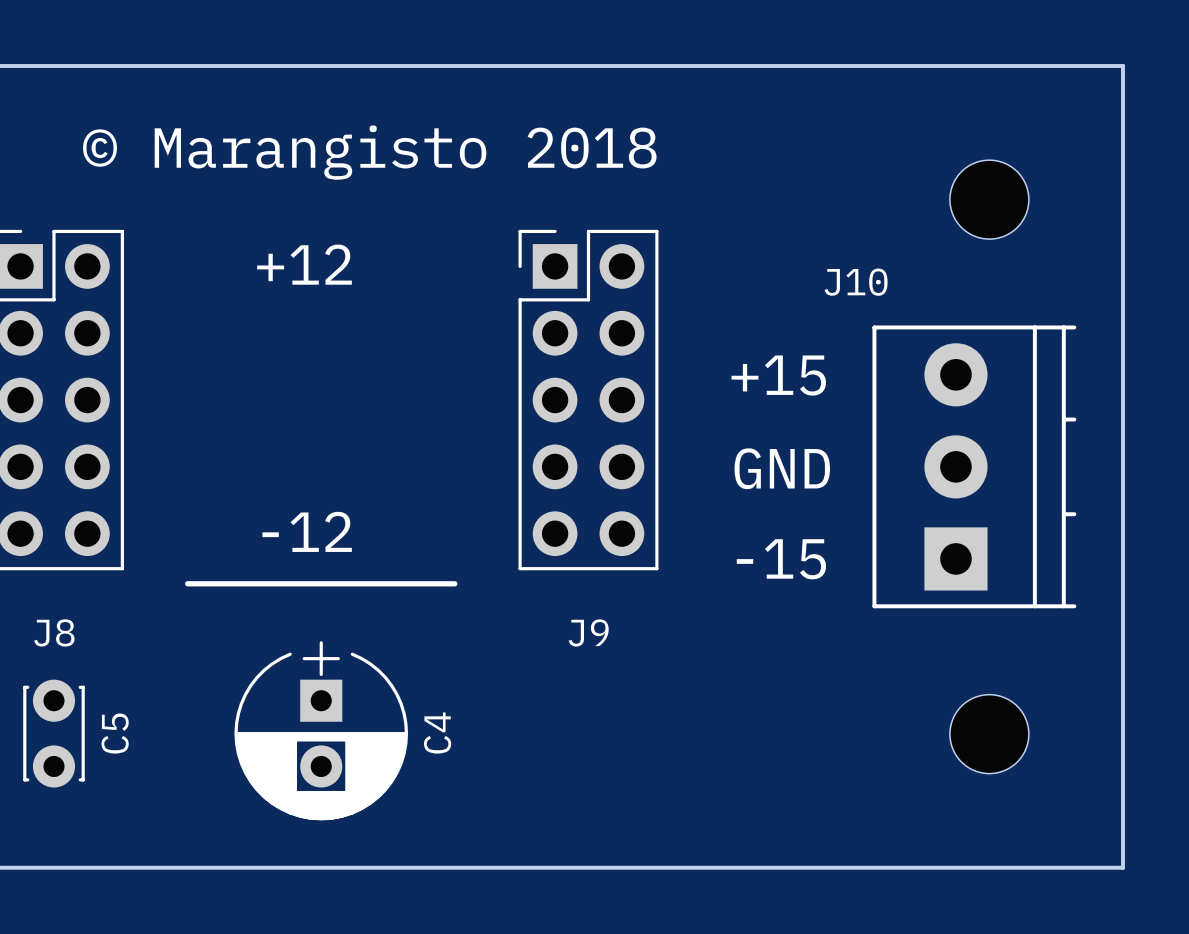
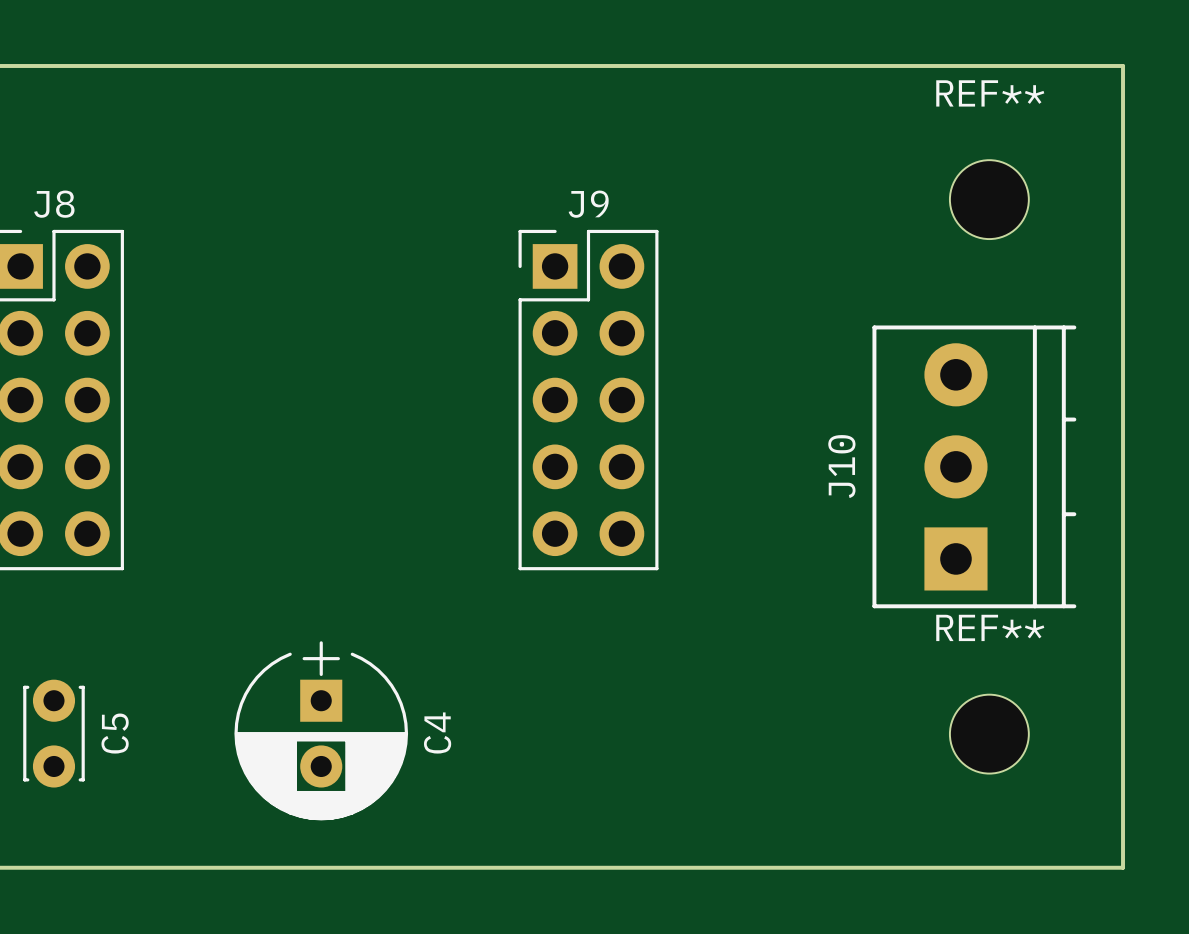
REF** name: none -> REF** (990, 93)
text: © Marangisto 2018 (369, 152) -> none
text: +12 (304, 264) -> none
J10 name rotation: 0° (856, 282) -> 90° counterclockwise (841, 466)
J10 name position: J10 (856, 282) -> J10 (841, 466)
text: +15 (778, 375) -> none
text: GND (782, 468) -> none
text: -12 (307, 531) -> none
text: -15 (781, 559) -> none
line: (187, 583) (454, 583) -> none
REF** name: none -> REF** (990, 627)
J8 name position: J8 (54, 632) -> J8 (54, 204)
J9 name position: J9 (588, 632) -> J9 (588, 204)

